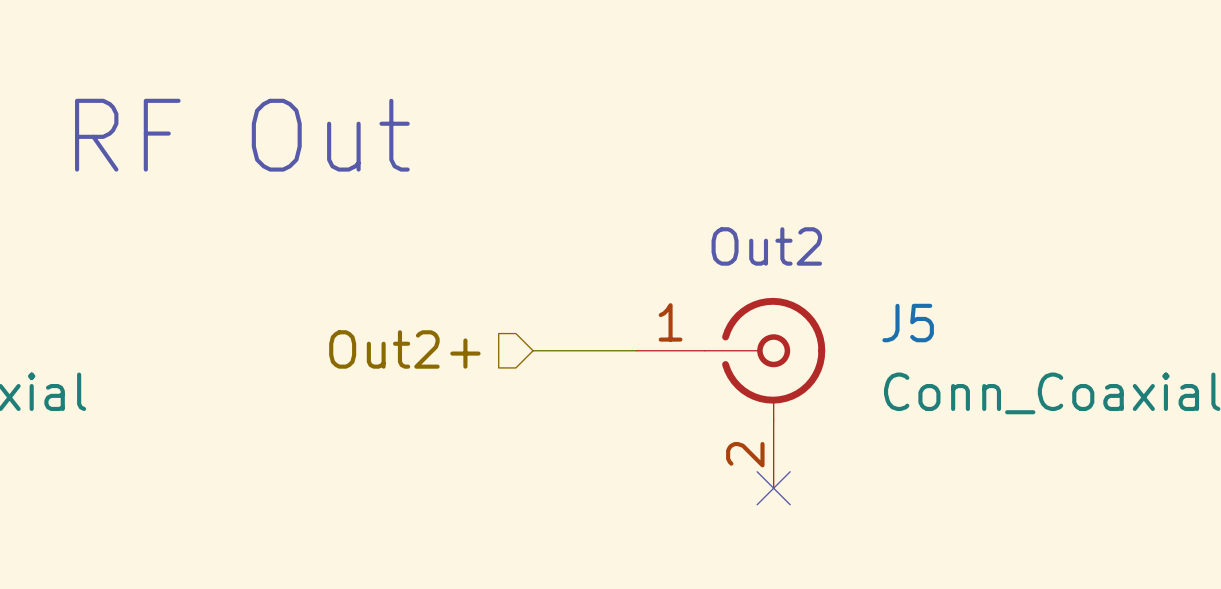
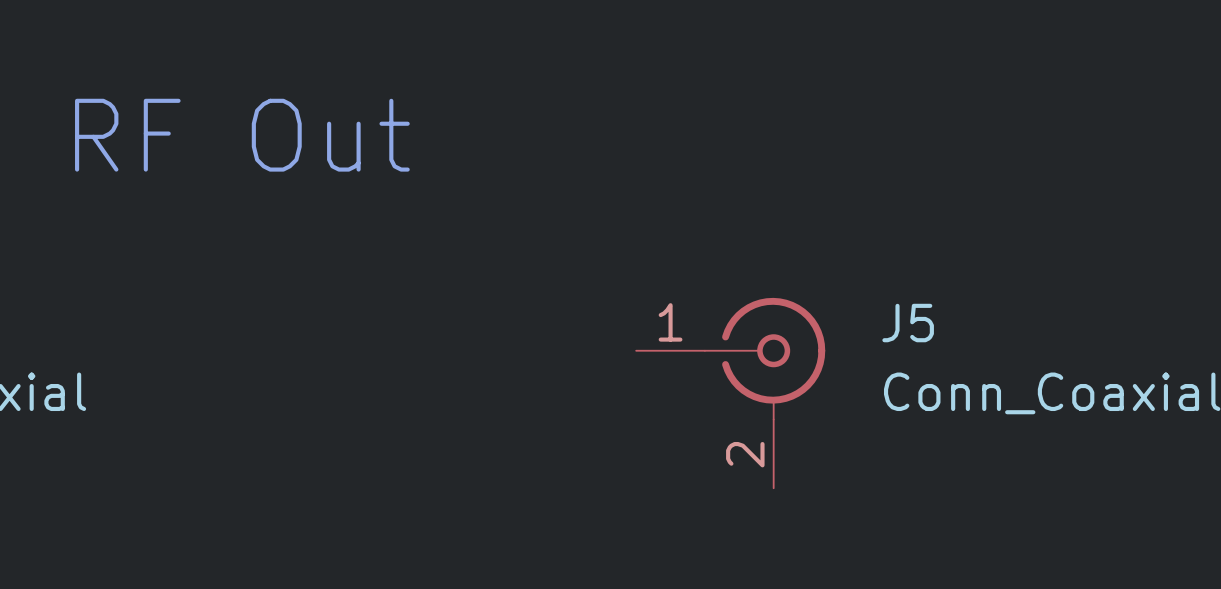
text: Out2 (766, 246) -> none
hierarchical label: Out2+ (404, 349) -> none
wire: (533, 350) (636, 350) -> none
no-connect mark: (773, 488) -> none

